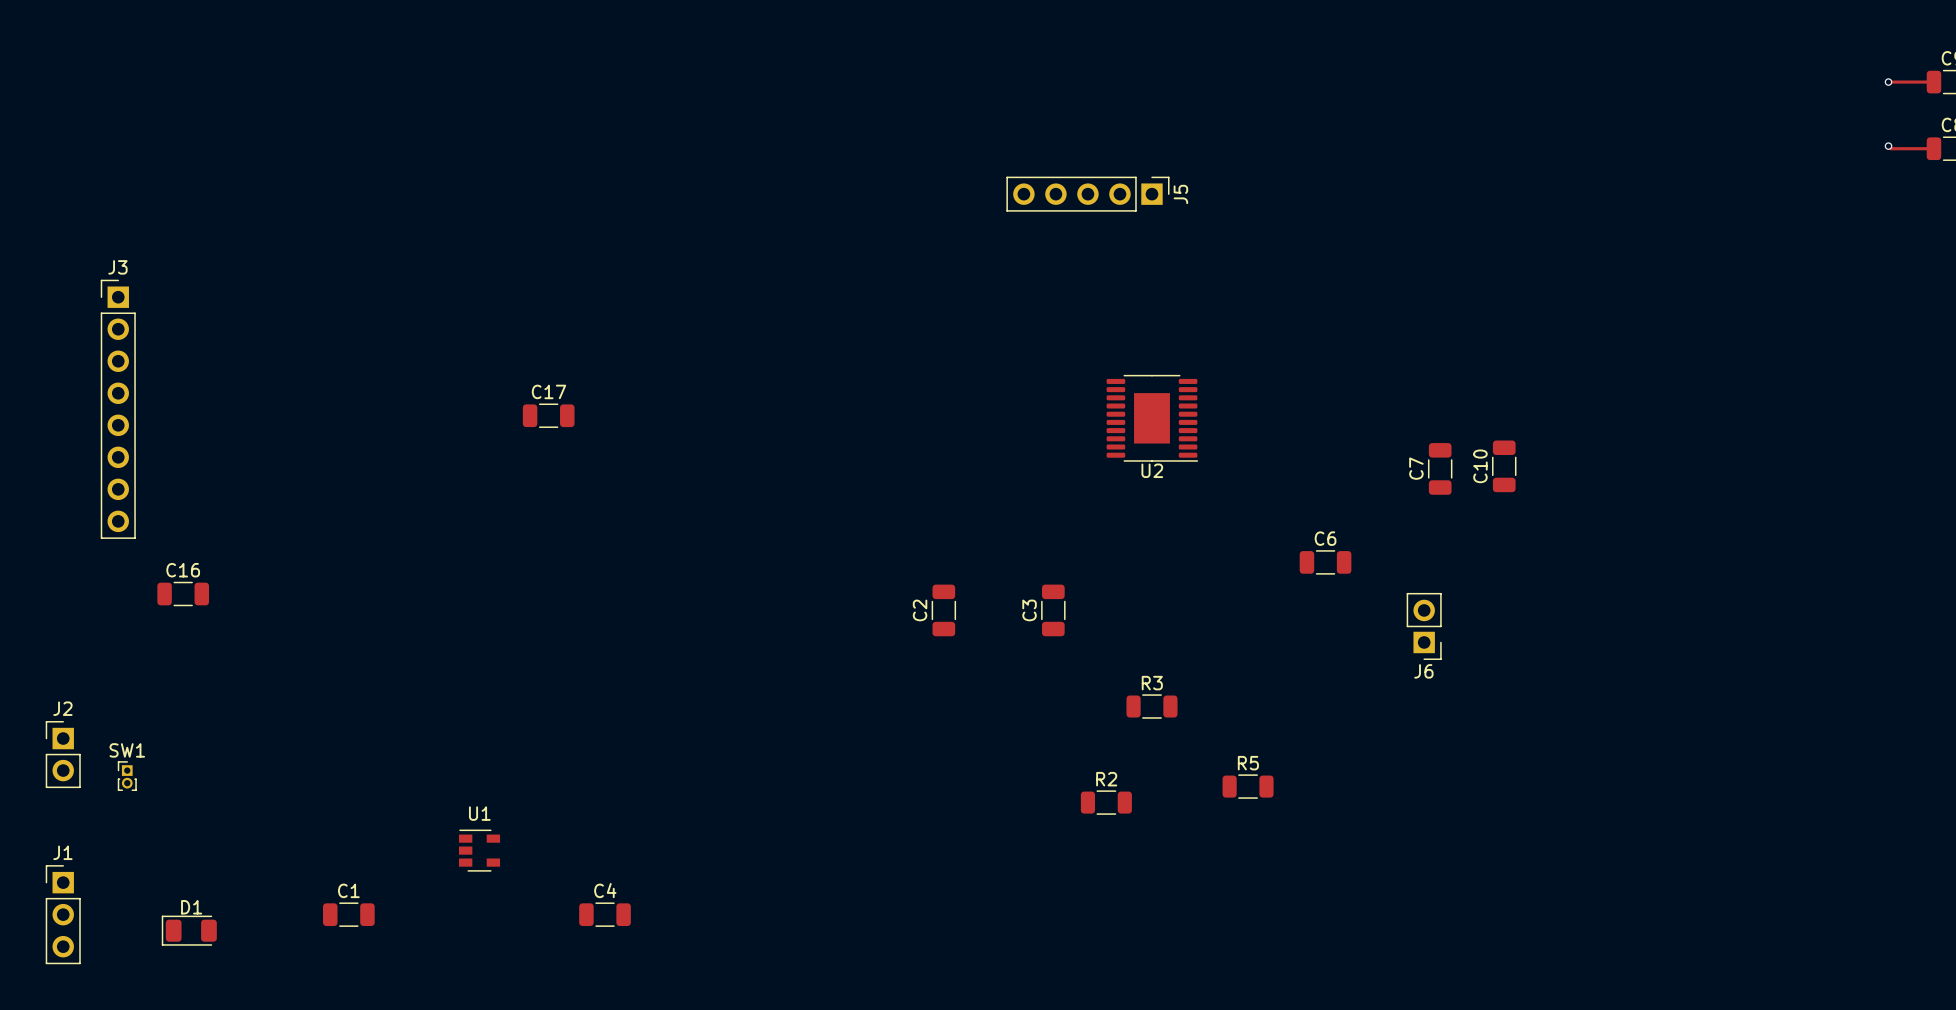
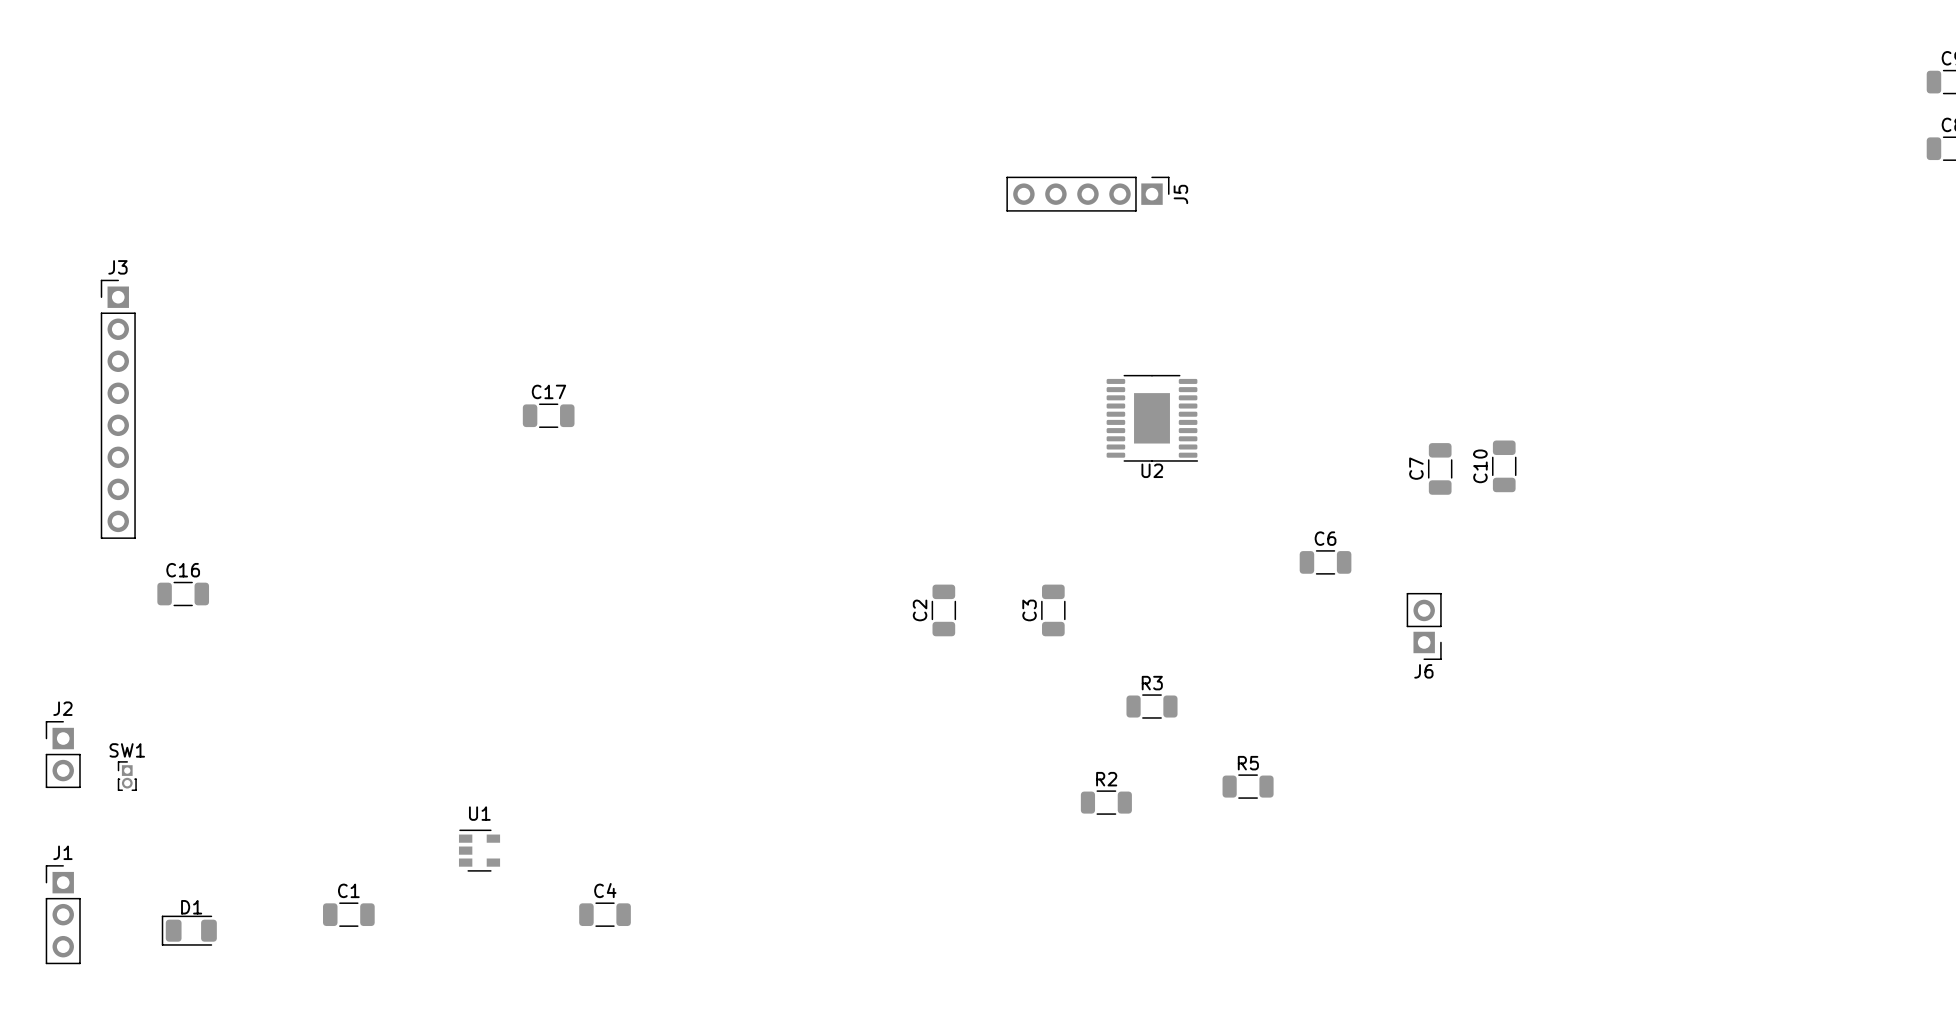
track: (1888, 82) (1933, 82) -> none
via: (1888, 82) -> none
track: (1888, 146) (1891, 148) (1933, 148) -> none
via: (1888, 146) -> none

